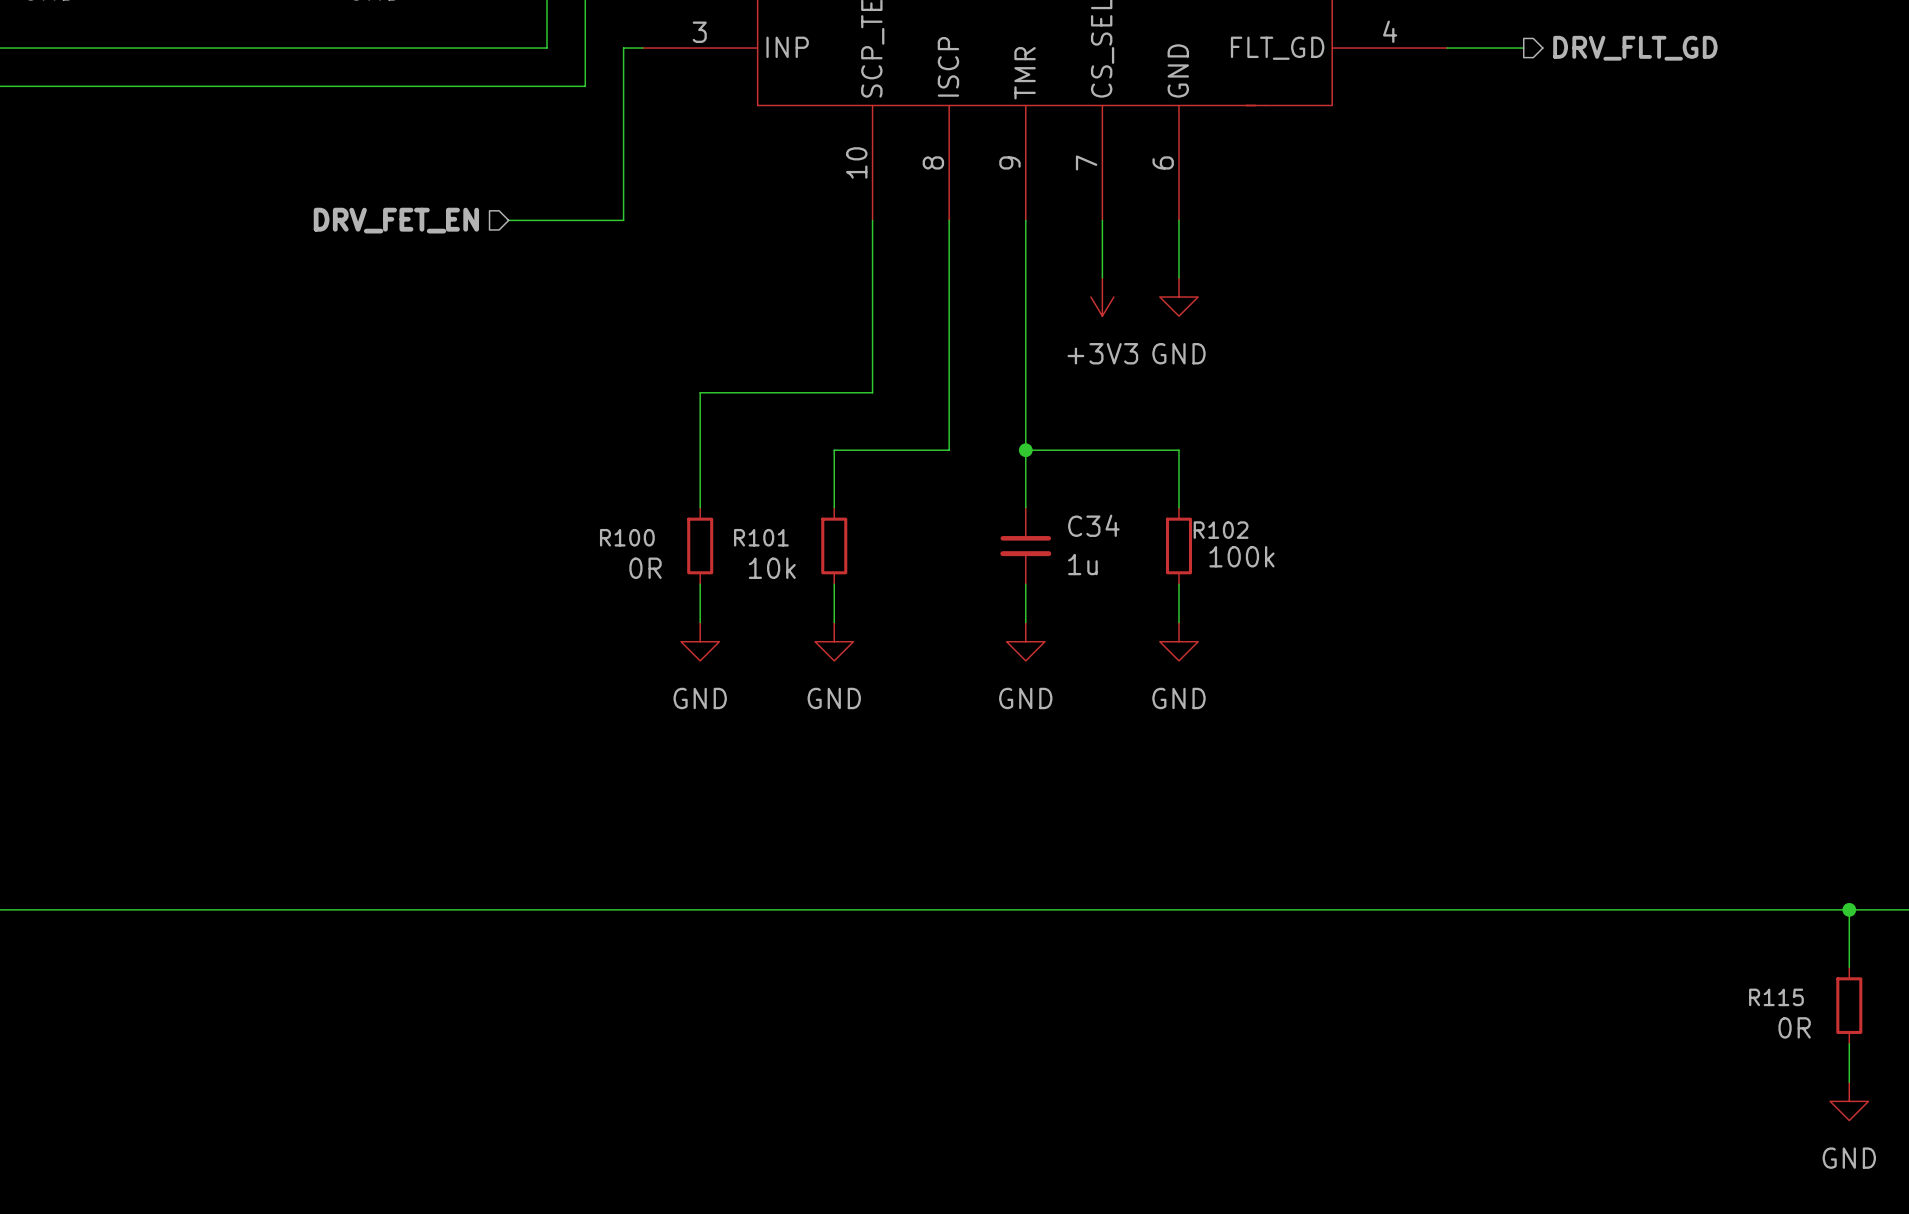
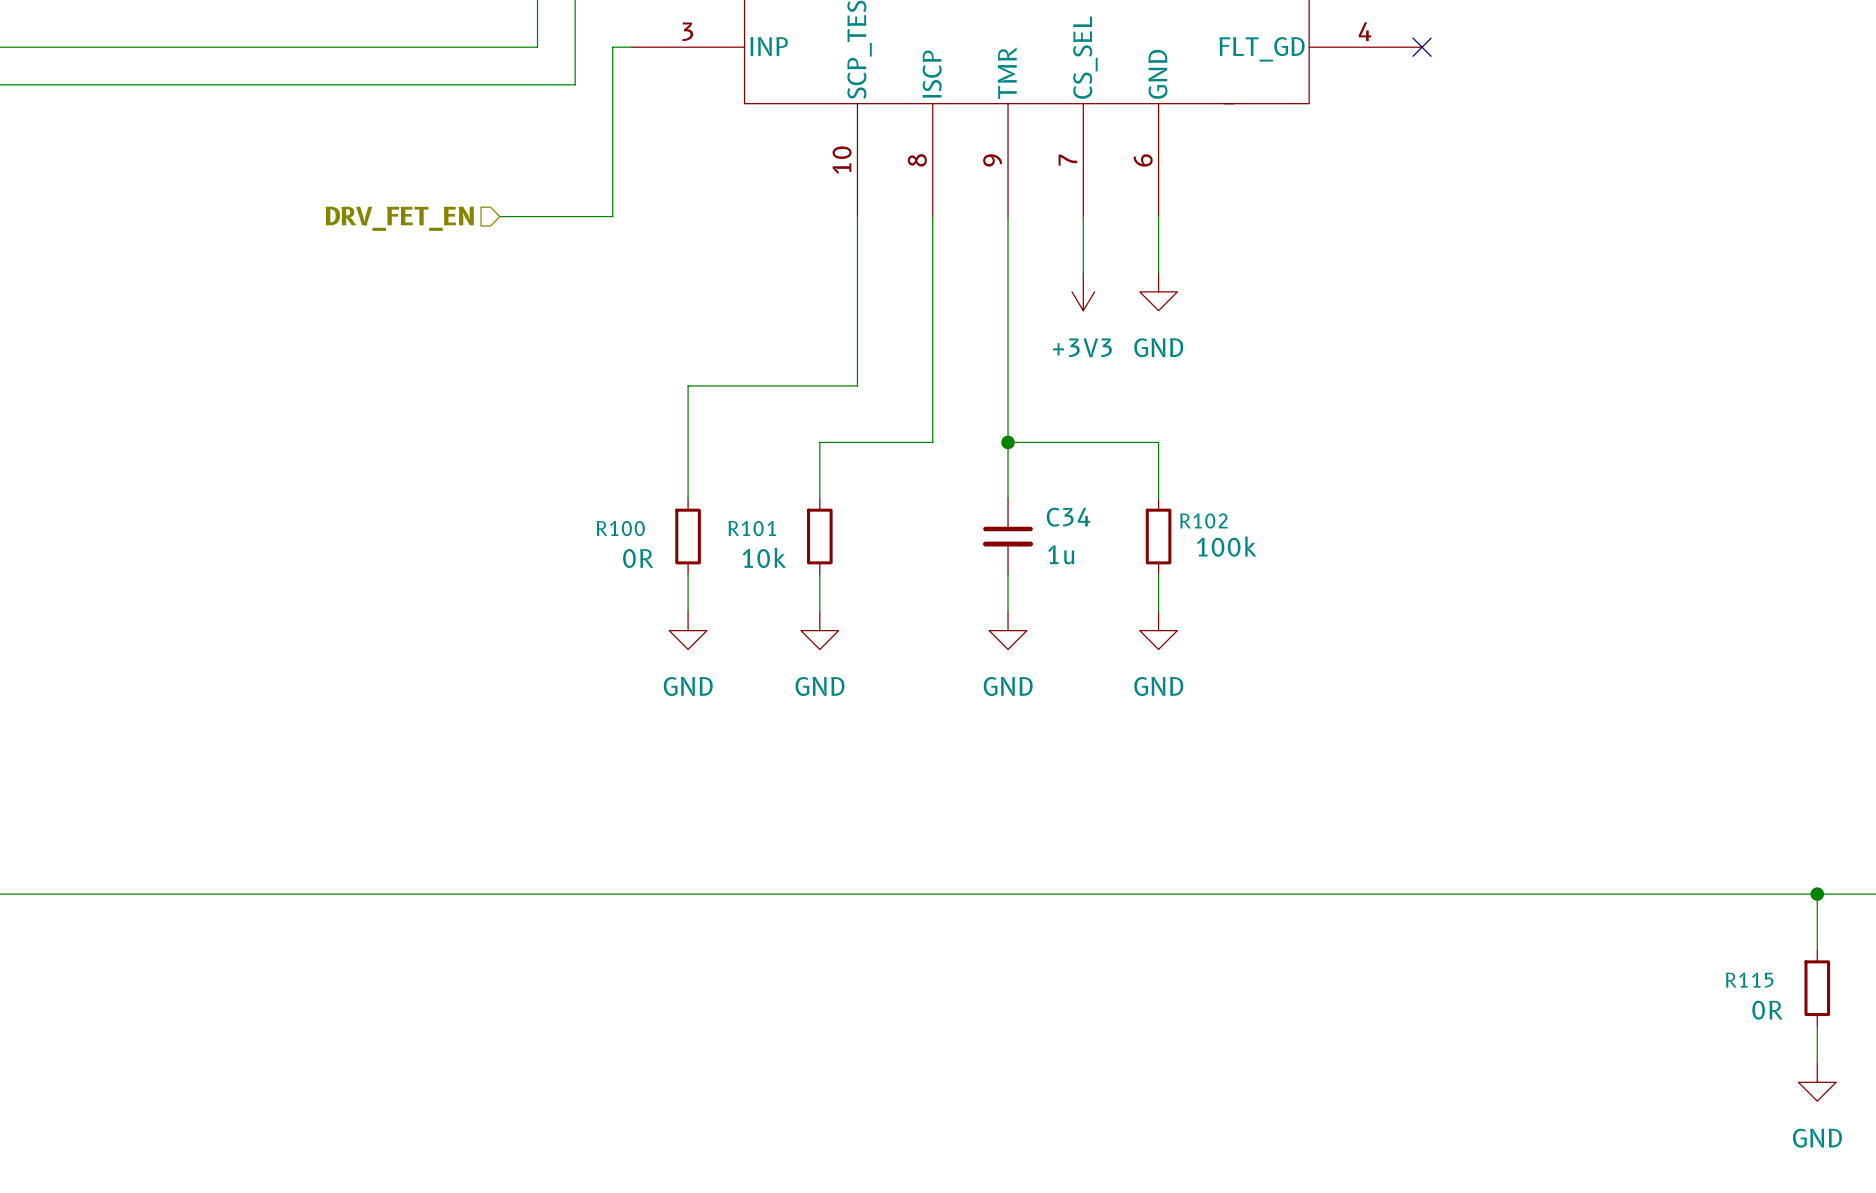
wire: (1447, 48) (1523, 48) -> none
no-connect mark: none -> (1422, 47)
hierarchical label: DRV_FLT_GD (1635, 48) -> none

